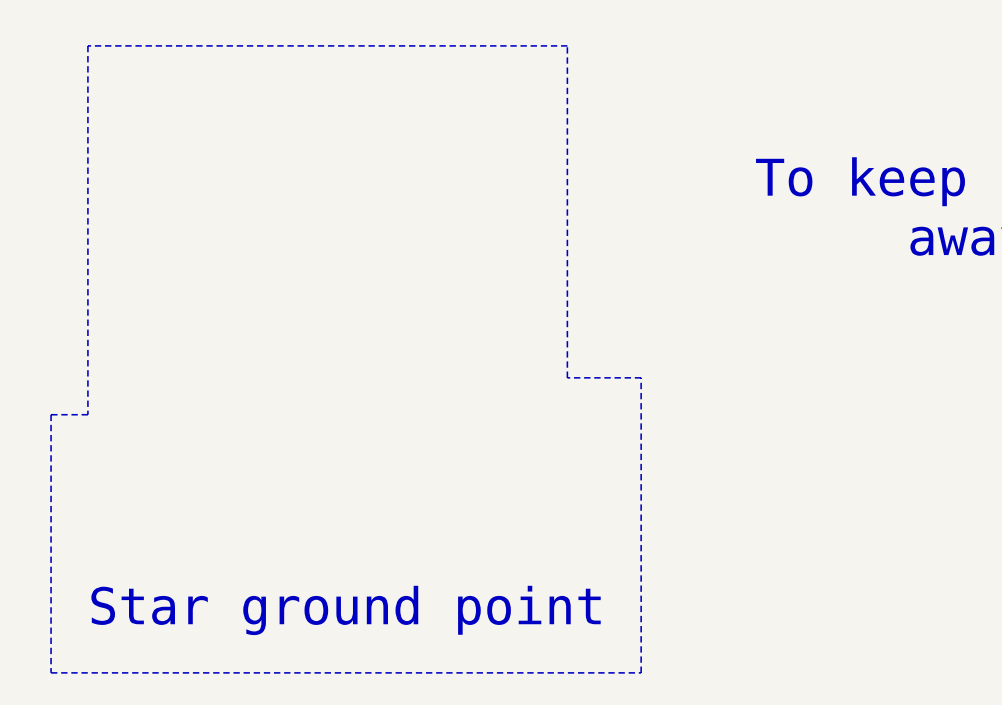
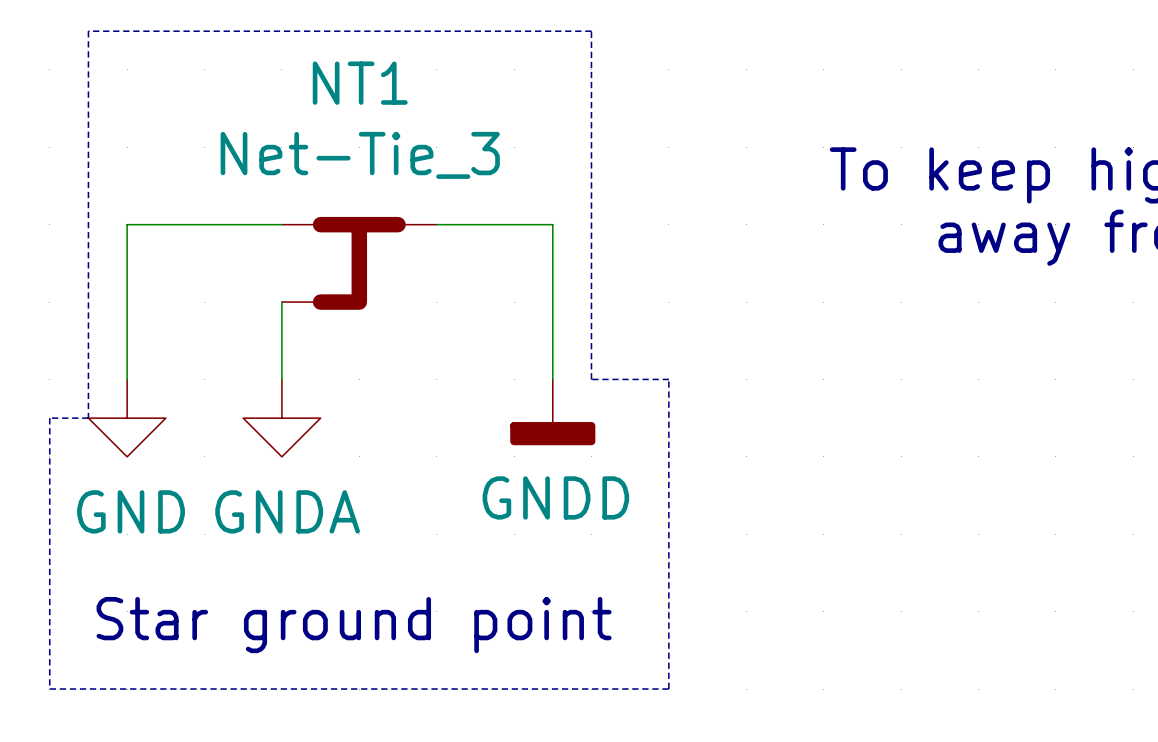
wire: none -> (281, 224) (127, 224) (127, 379)
wire: none -> (436, 224) (552, 224) (552, 379)
NT1: none -> Net-Tie_3 (359, 263)
wire: none -> (281, 302) (281, 379)
power symbol: none -> GNDD (552, 412)
power symbol: none -> GND (127, 418)
power symbol: none -> GNDA (281, 418)

